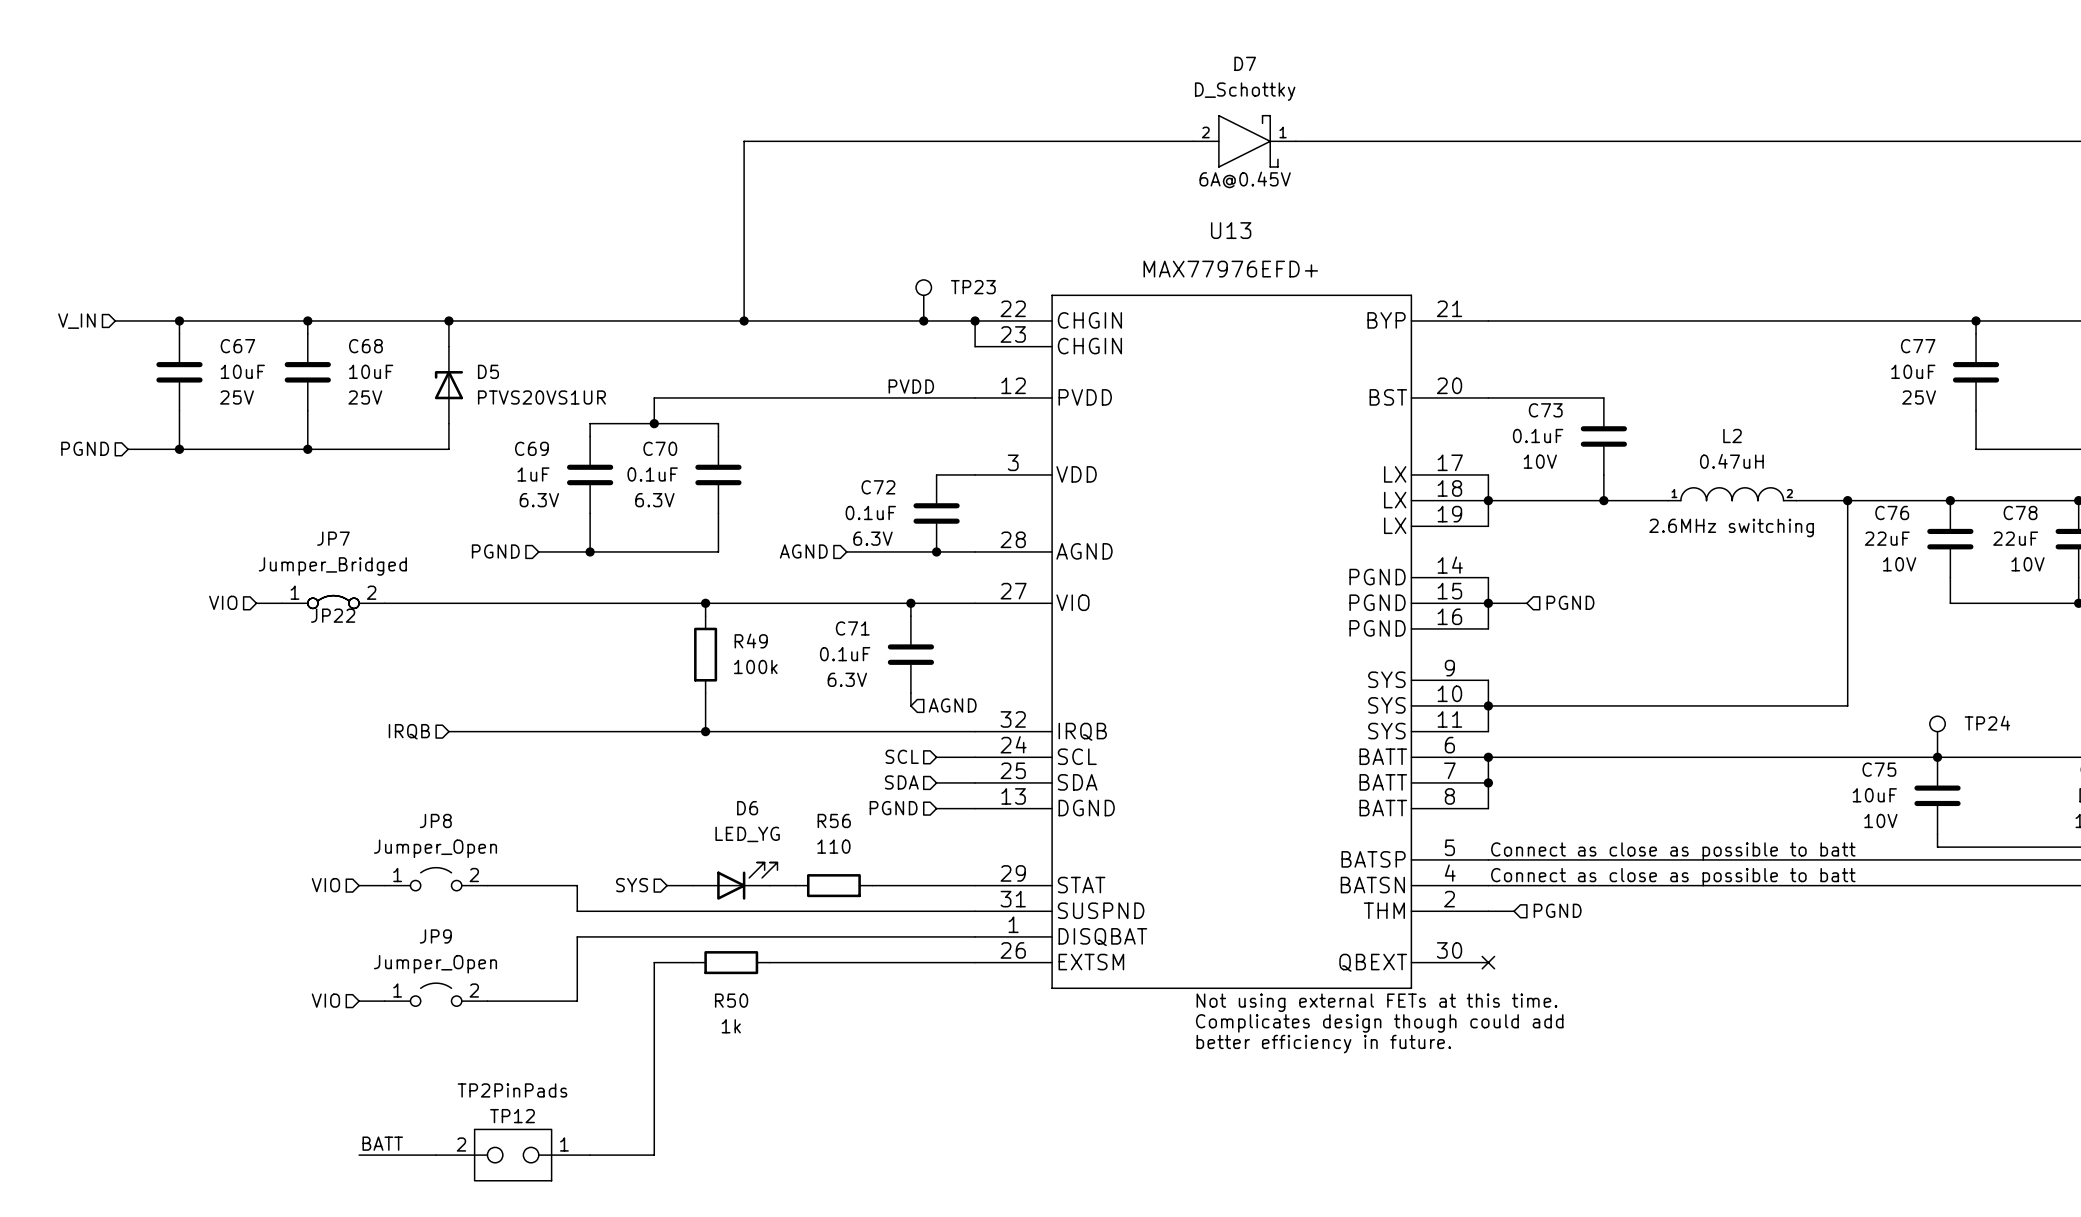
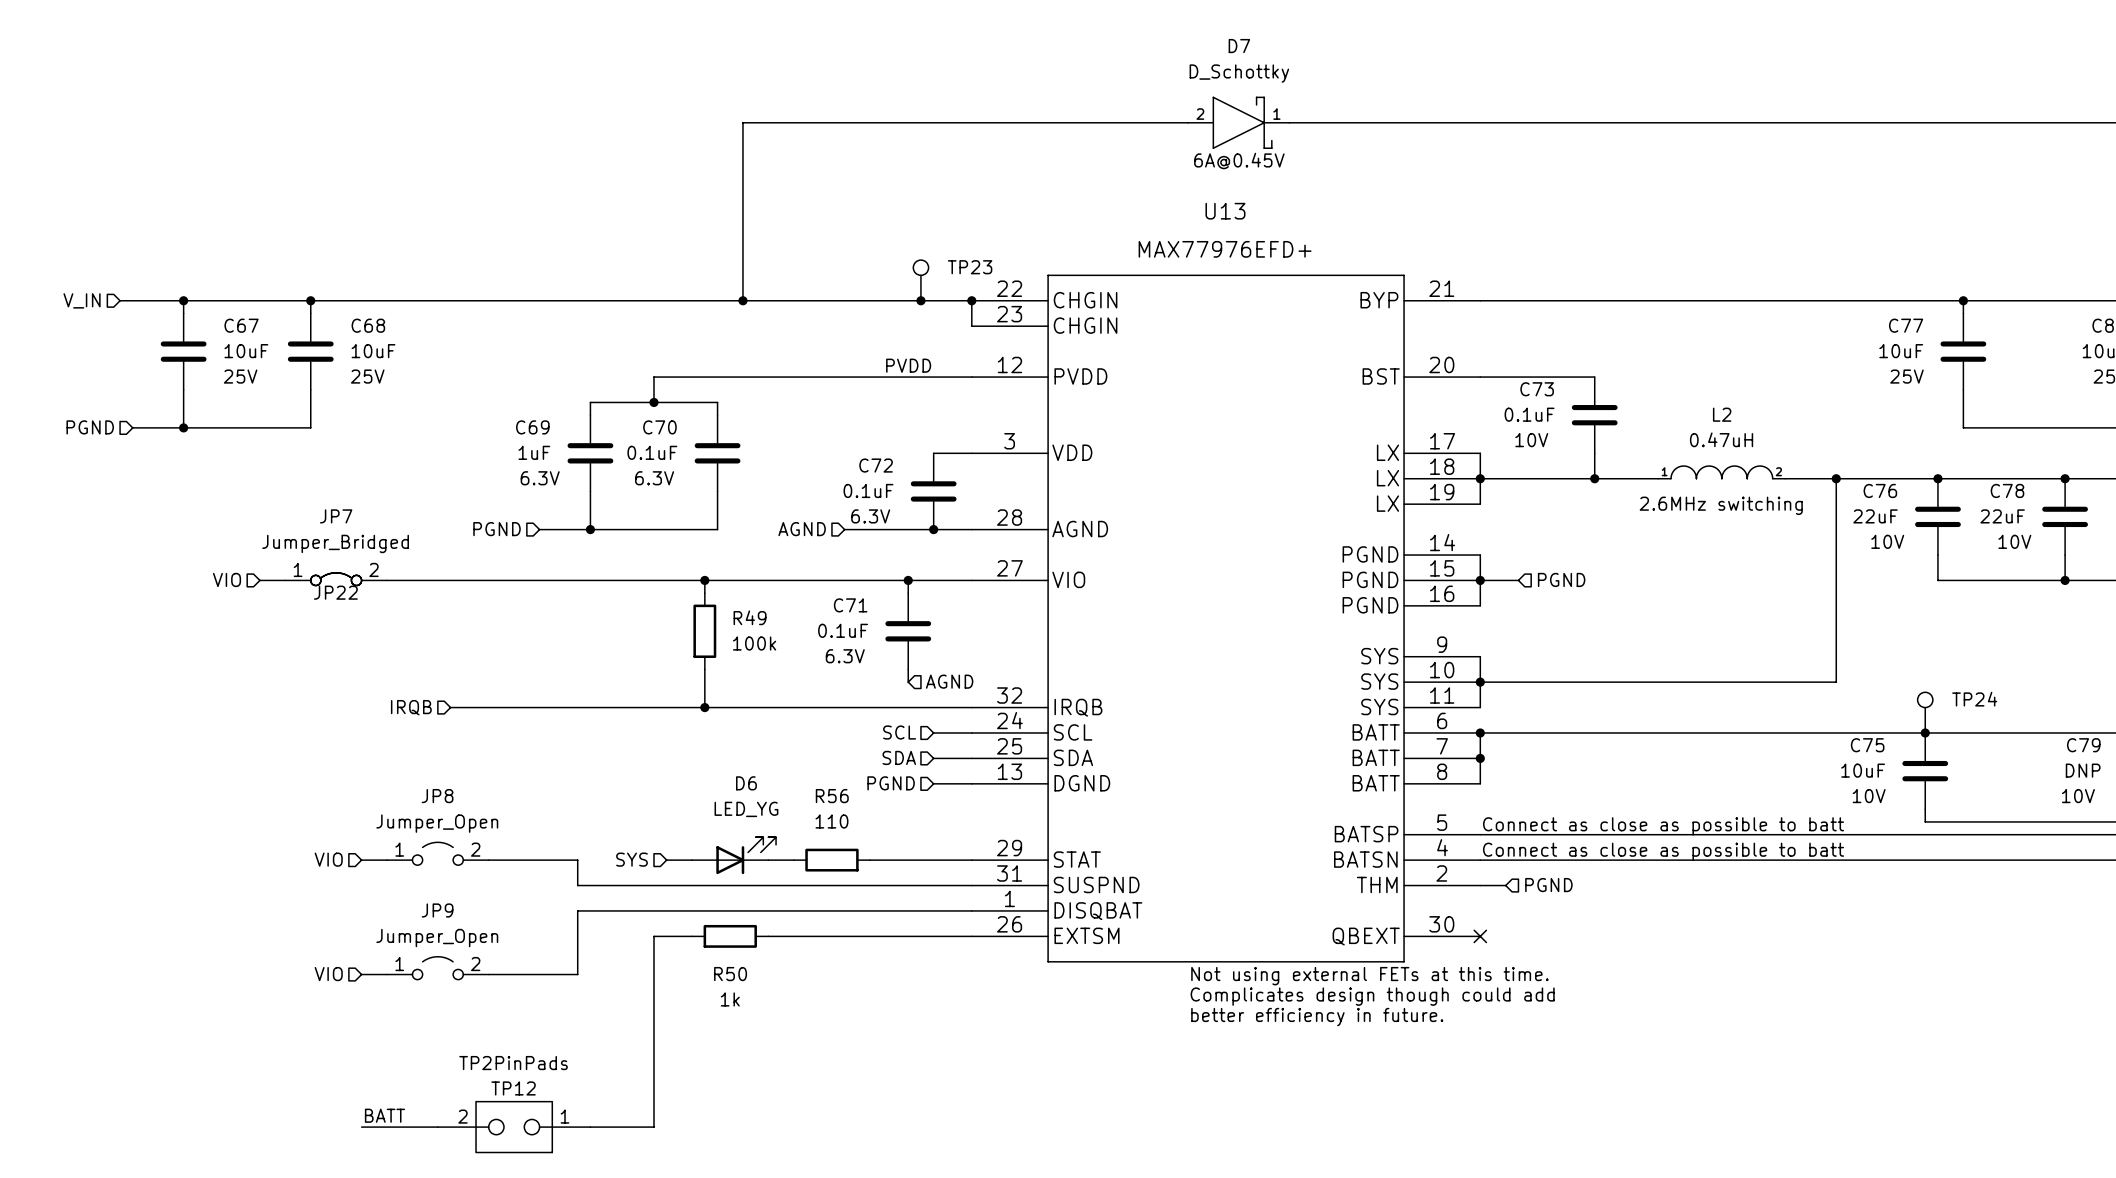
wire: (448, 320) (448, 346) -> none
junction: (448, 320) -> none
D5: PTVS20VS1UR (448, 385) -> none
wire: (448, 423) (448, 449) (307, 449) -> none
junction: (307, 449) -> none

